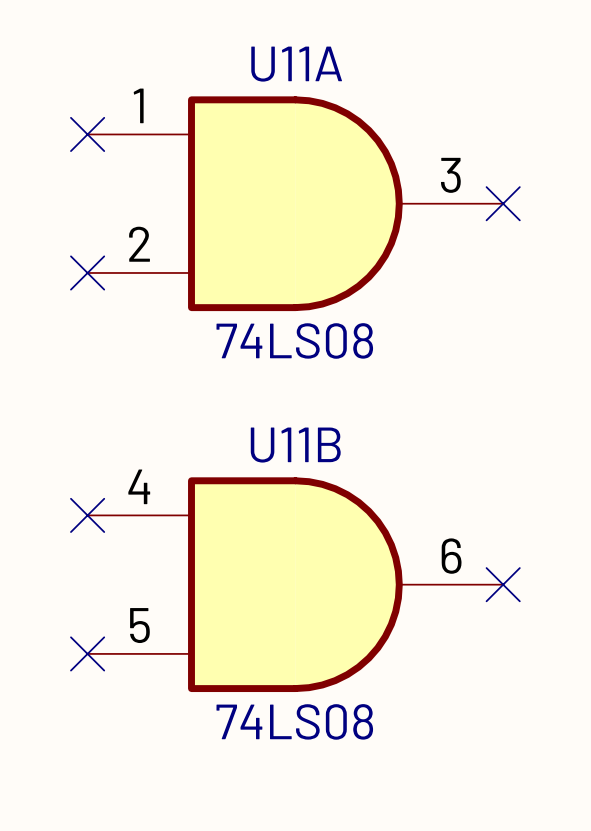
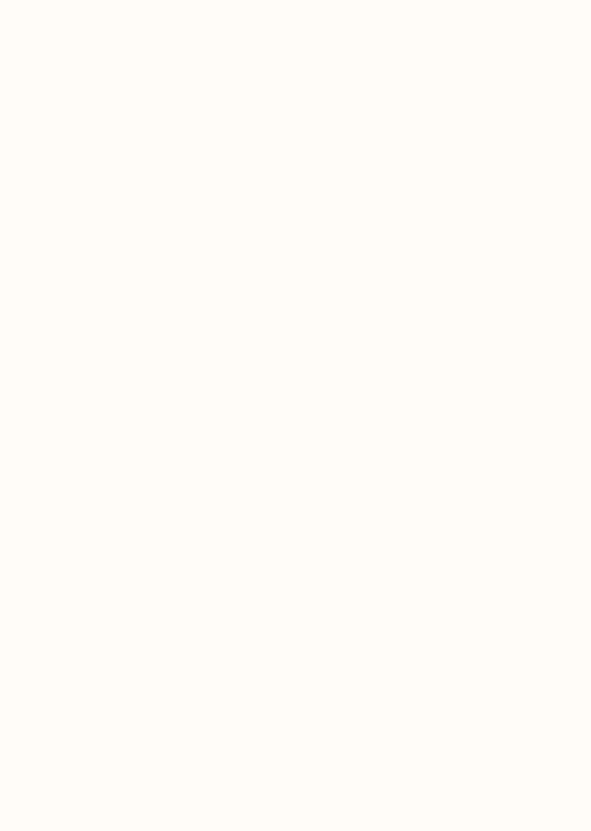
no-connect mark: (87, 134) -> none
U11A: 74LS08 (295, 203) -> none
no-connect mark: (503, 203) -> none
no-connect mark: (87, 272) -> none
no-connect mark: (87, 515) -> none
U11B: 74LS08 (295, 584) -> none
no-connect mark: (503, 584) -> none
no-connect mark: (87, 653) -> none

